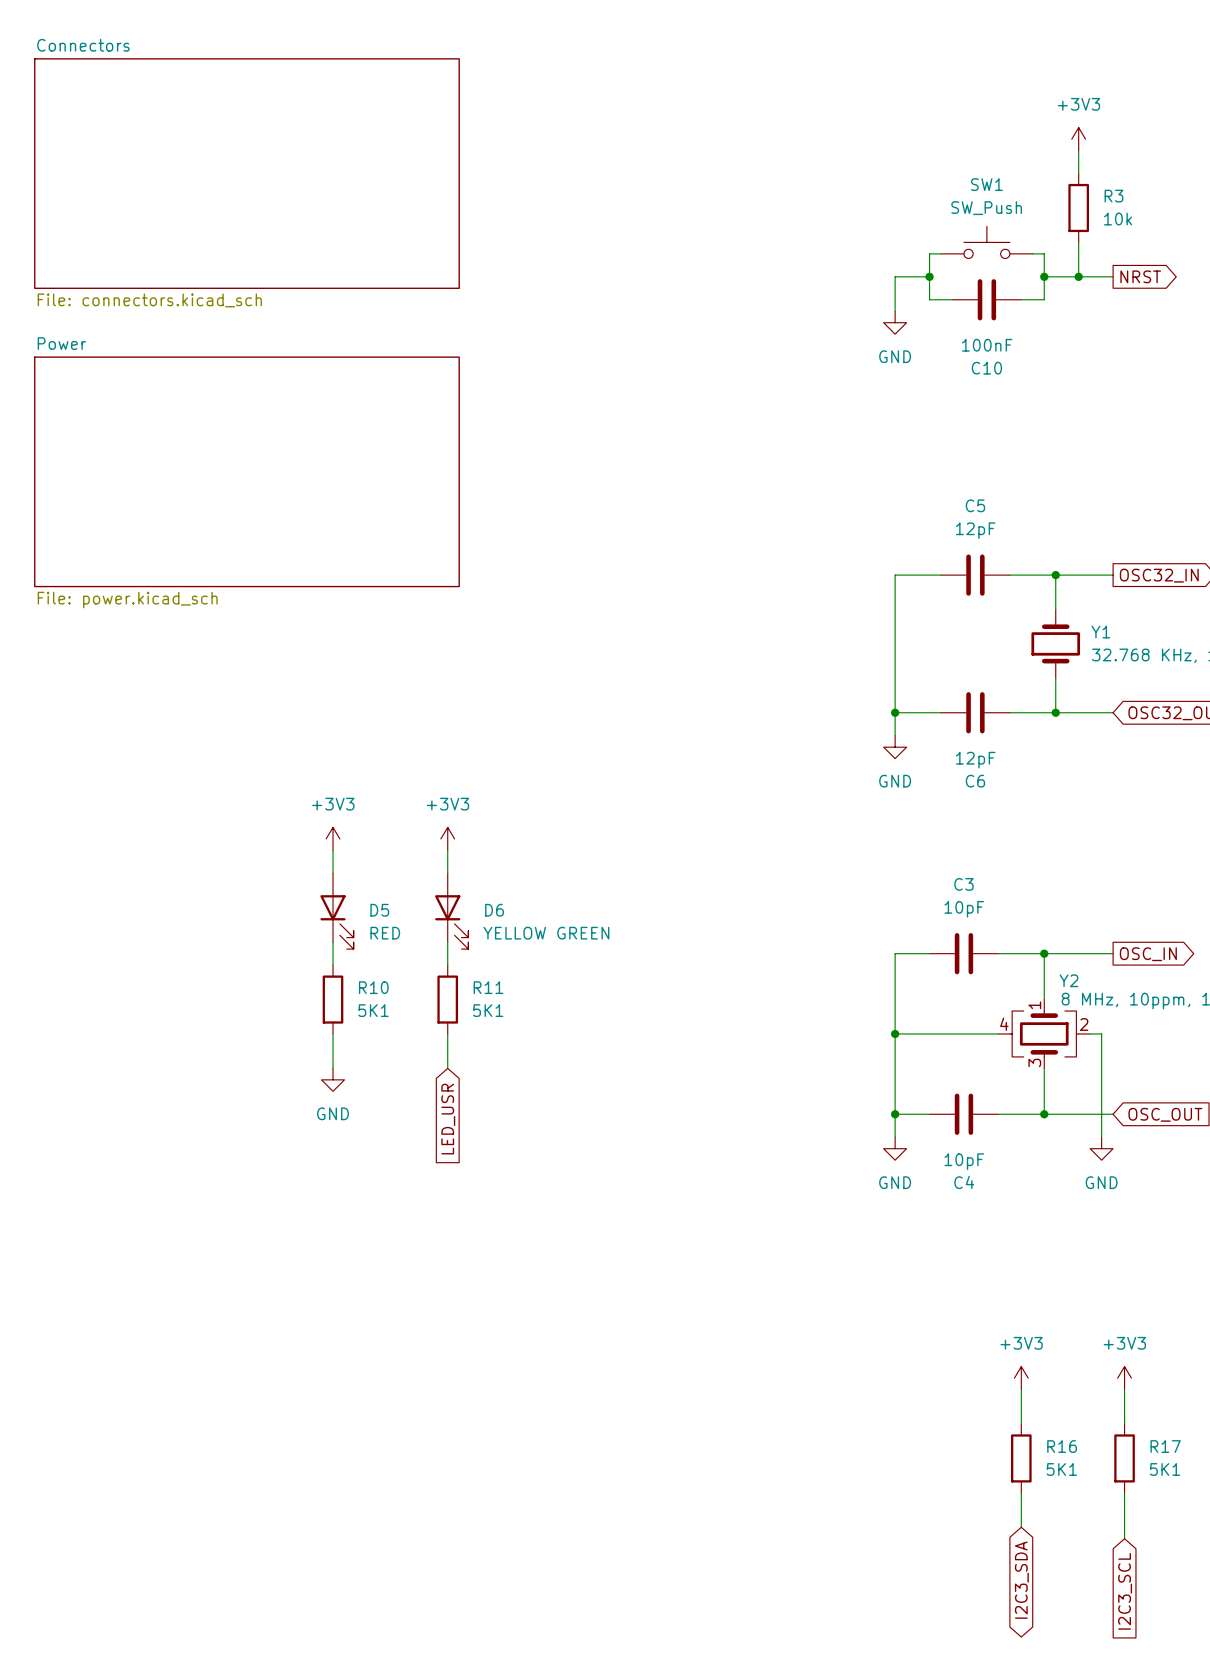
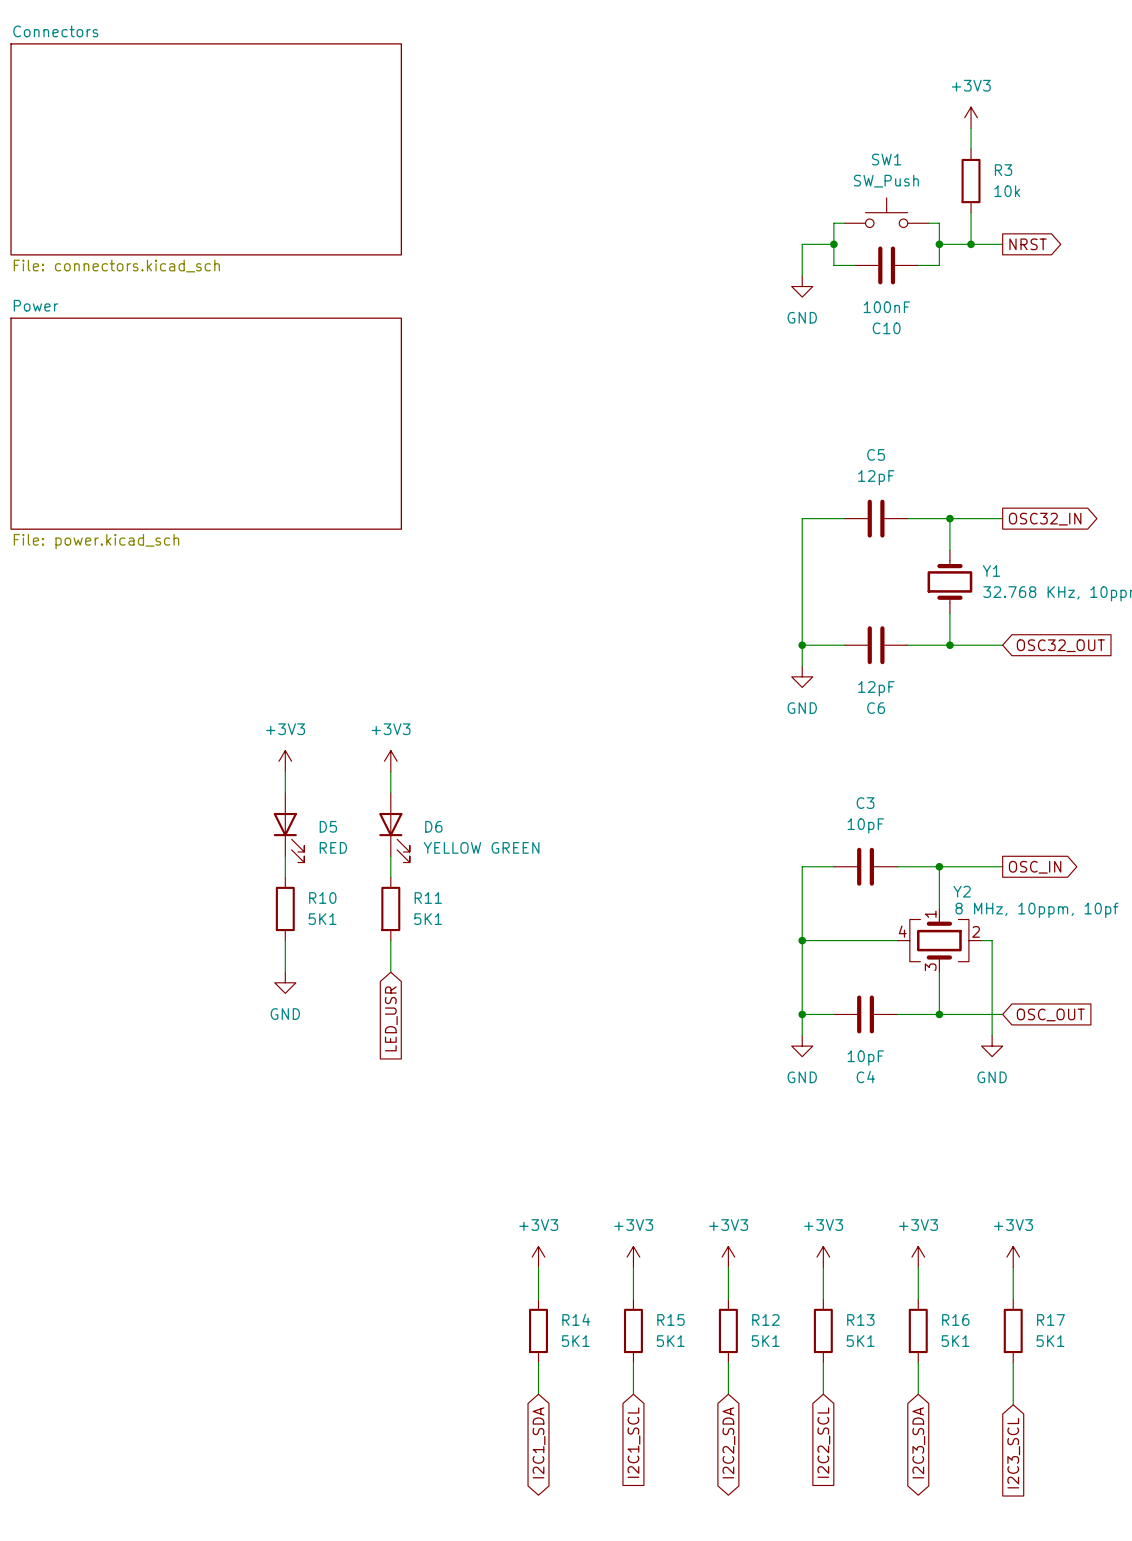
power symbol: none -> +3V3 (538, 1257)
power symbol: none -> +3V3 (633, 1257)
power symbol: none -> +3V3 (728, 1257)
power symbol: none -> +3V3 (823, 1257)
wire: none -> (538, 1267) (538, 1299)
wire: none -> (633, 1267) (633, 1299)
wire: none -> (728, 1267) (728, 1299)
wire: none -> (823, 1267) (823, 1299)
R14: none -> 5K1 (538, 1330)
R15: none -> 5K1 (633, 1330)
R12: none -> 5K1 (728, 1330)
R13: none -> 5K1 (823, 1330)
wire: none -> (538, 1362) (538, 1394)
wire: none -> (633, 1362) (633, 1394)
wire: none -> (728, 1362) (728, 1394)
wire: none -> (823, 1362) (823, 1394)
global label: none -> I2C1_SCL (633, 1442)
global label: none -> I2C2_SCL (823, 1442)
global label: none -> I2C1_SDA (539, 1442)
global label: none -> I2C2_SDA (728, 1442)

